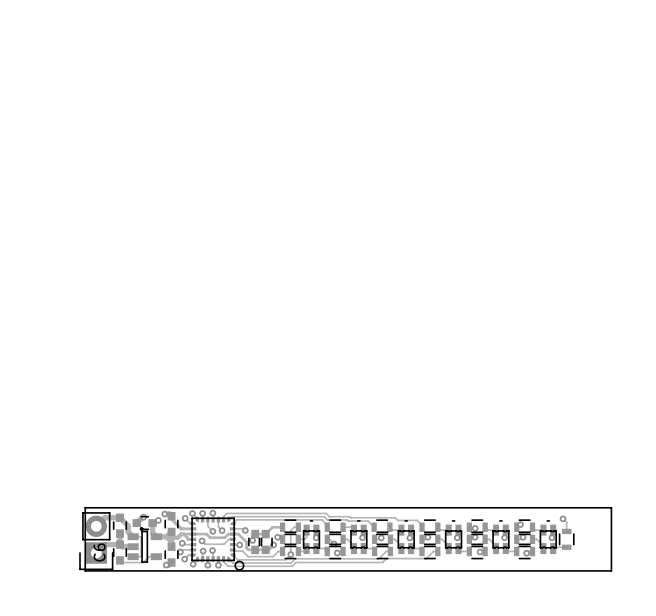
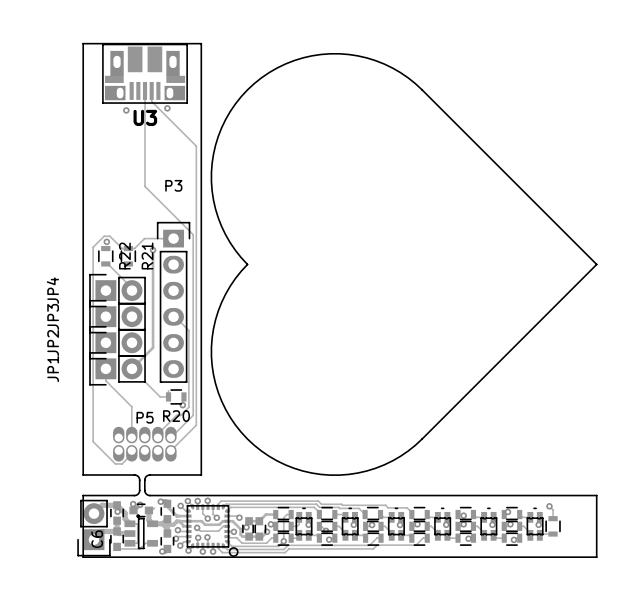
U3: none -> (145, 73)
board edge: none -> (422, 89) (596, 264) (422, 439) (400, 456) (375, 468) (348, 474) (320, 474) (294, 468) (269, 456) (241, 432) (225, 409) (213, 374) (212, 337) (218, 310) (230, 286) (247, 264) (225, 234) (213, 200) (212, 163) (218, 136) (230, 111) (254, 83) (285, 64) (311, 55) (348, 54) (375, 60) (400, 72) (422, 89)
track: none -> (145, 90) (145, 186) (193, 234) (193, 415) (170, 437)
track: none -> (151, 90) (151, 101) (196, 146) (196, 425) (170, 450)
via: none -> (167, 108)
via: none -> (126, 110)
track: none -> (173, 238) (144, 238) (134, 248) (122, 248) (109, 236) (104, 236) (93, 247) (93, 441) (115, 463) (122, 463) (131, 454) (131, 450)
via: none -> (106, 241)
track: none -> (153, 250) (153, 347) (131, 368)
via: none -> (153, 250)
R22: none -> (105, 256)
R21: none -> (128, 256)
track: none -> (105, 263) (131, 288) (131, 290)
JP4: none -> (117, 290)
P3: none -> (173, 302)
JP3: none -> (117, 316)
track: none -> (173, 316) (188, 330) (188, 407) (180, 415) (176, 415) (157, 434) (157, 437)
JP2: none -> (117, 342)
track: none -> (105, 368) (105, 380) (131, 406) (131, 437)
JP1: none -> (117, 368)
track: none -> (145, 382) (160, 396) (168, 396) (168, 390)
R20: none -> (176, 396)
via: none -> (182, 405)
P5: none -> (144, 444)
board edge: (137, 507) (153, 507) -> (134, 495) (139, 491) (139, 478) (136, 475) (83, 475) (83, 43) (201, 43) (201, 475) (147, 475) (144, 478) (144, 491) (149, 495)
via: none -> (133, 504)
via: (158, 520) -> none
via: none -> (117, 511)

